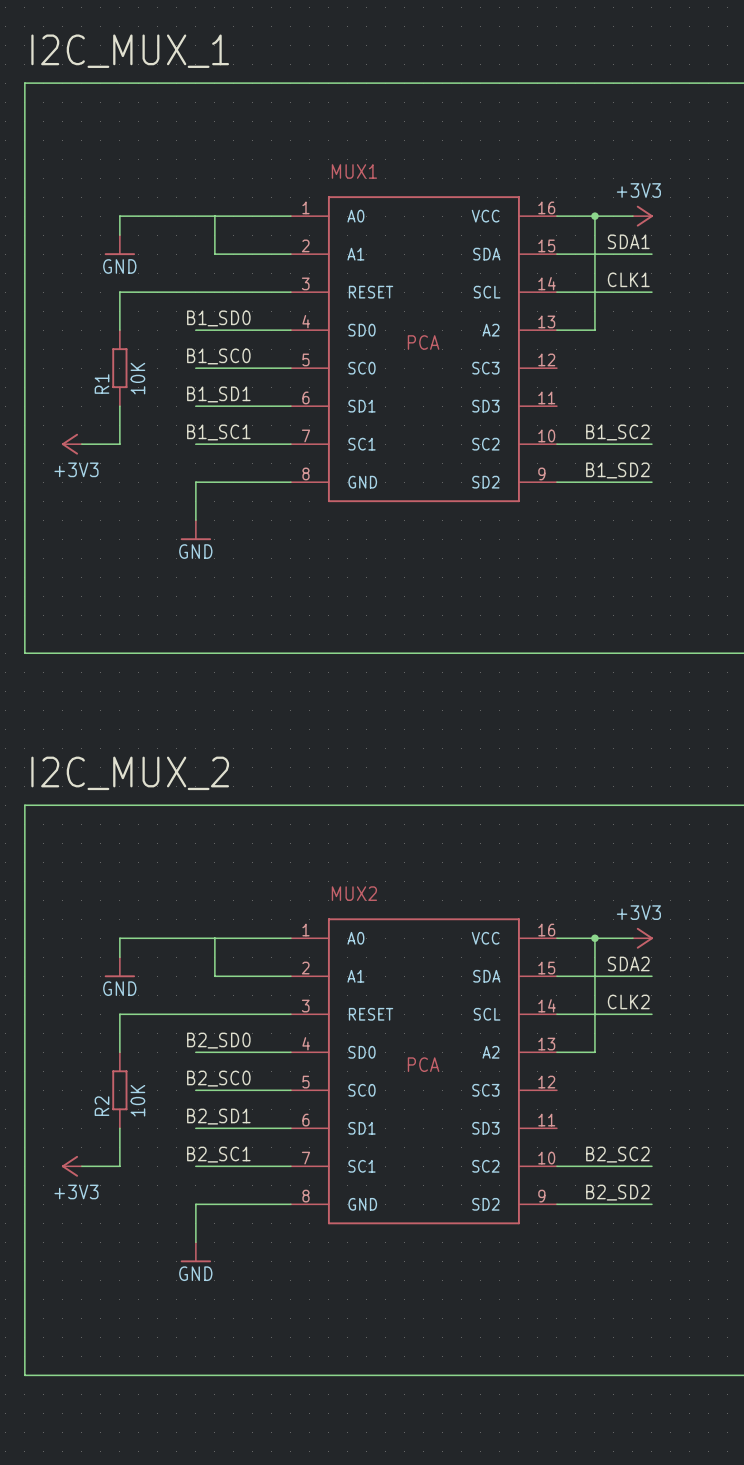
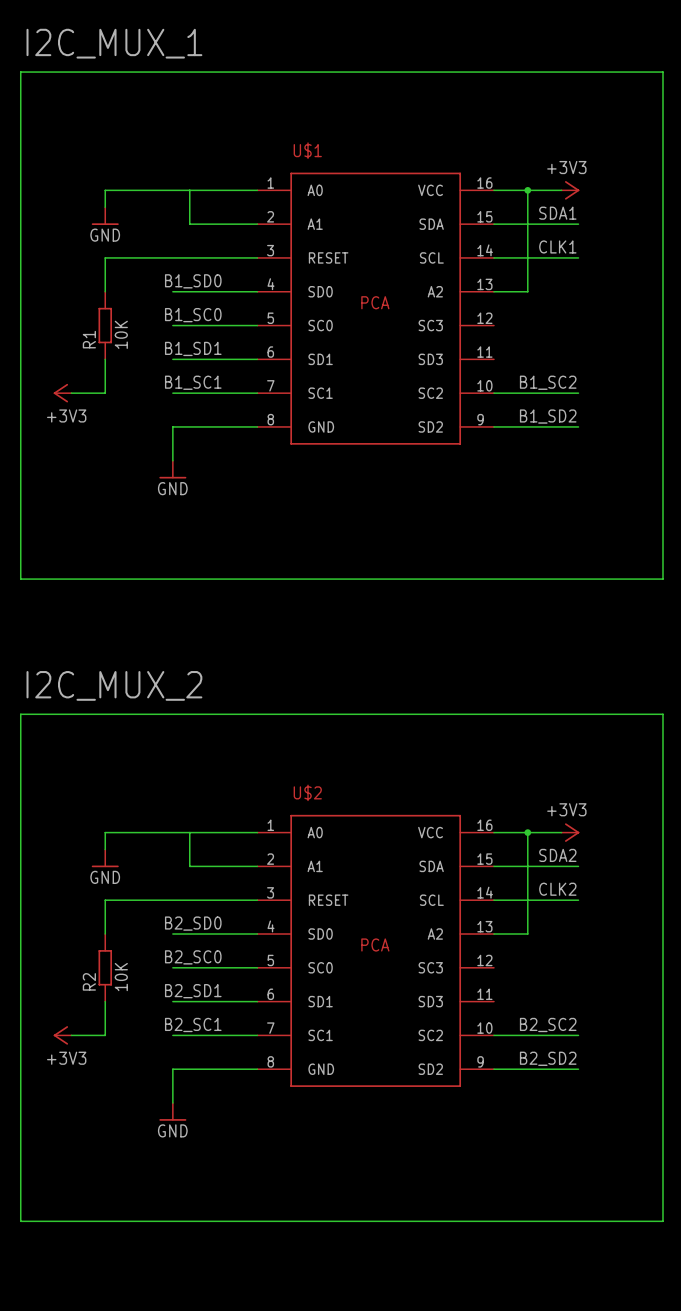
MUX1 name: MUX1 (354, 171) -> U$1 (307, 150)
MUX2 name: MUX2 (354, 893) -> U$2 (307, 792)

